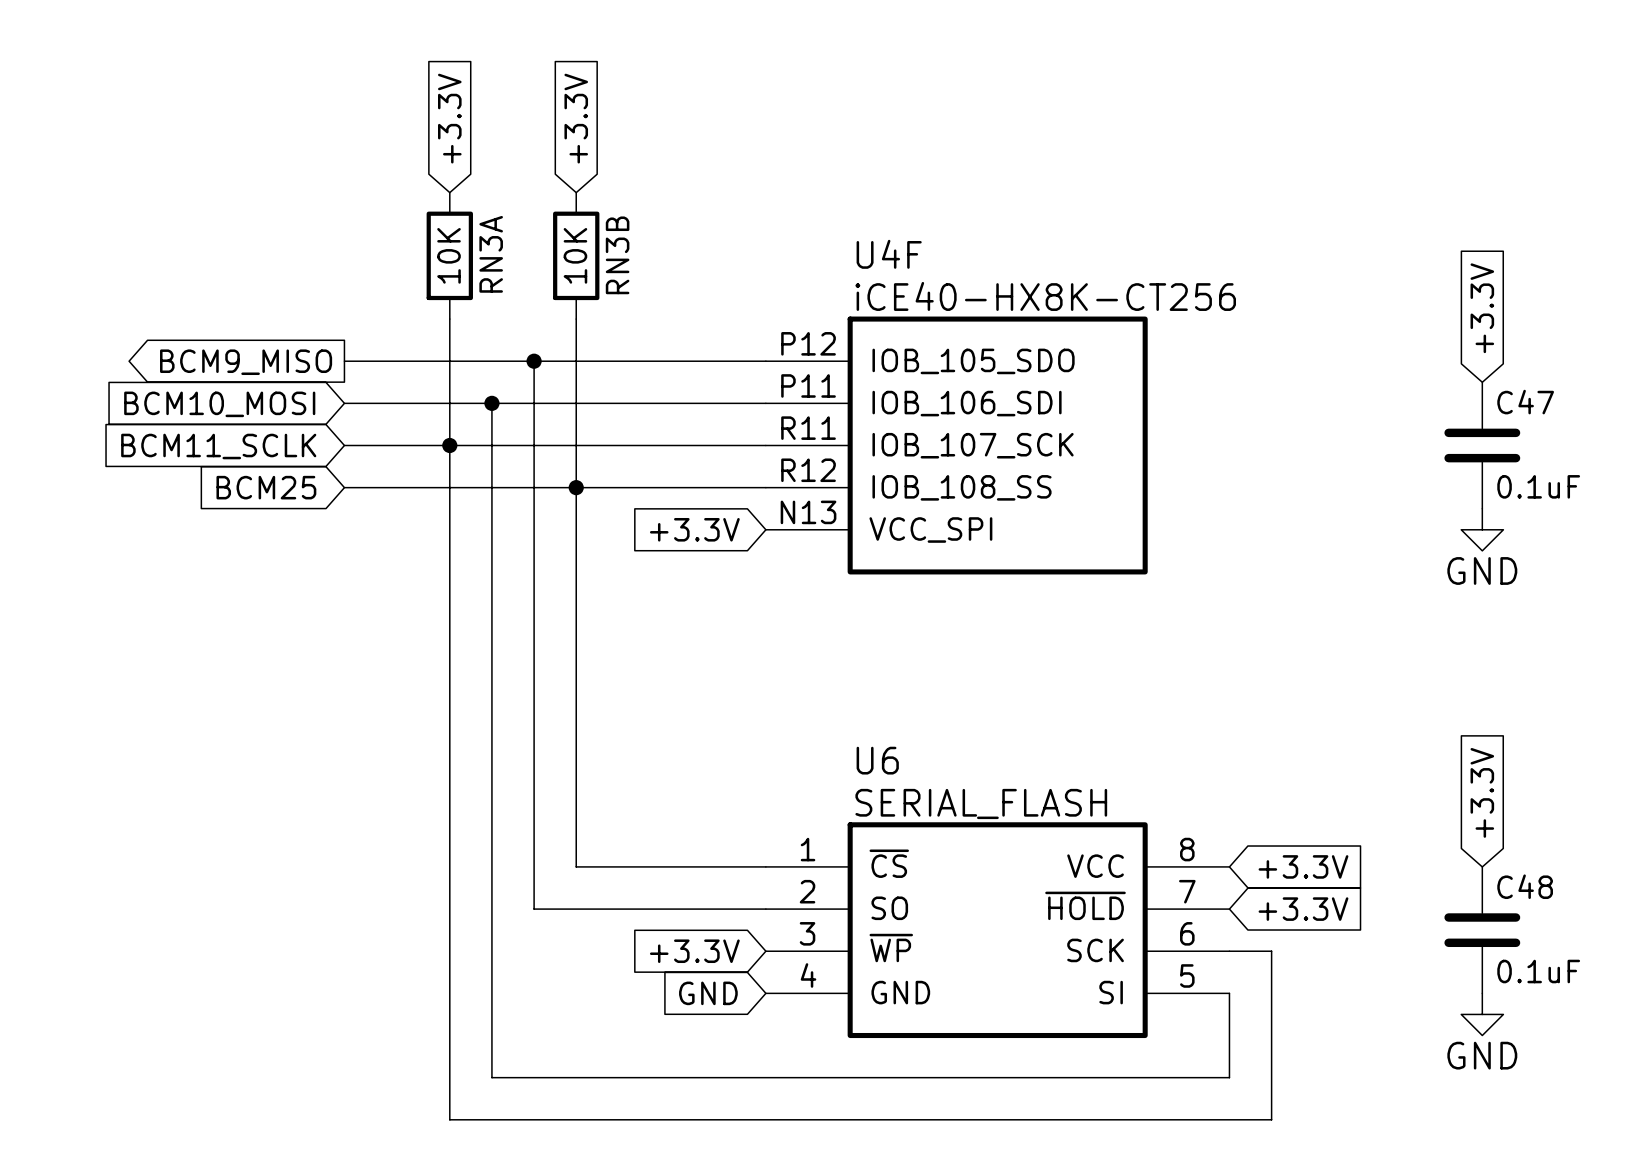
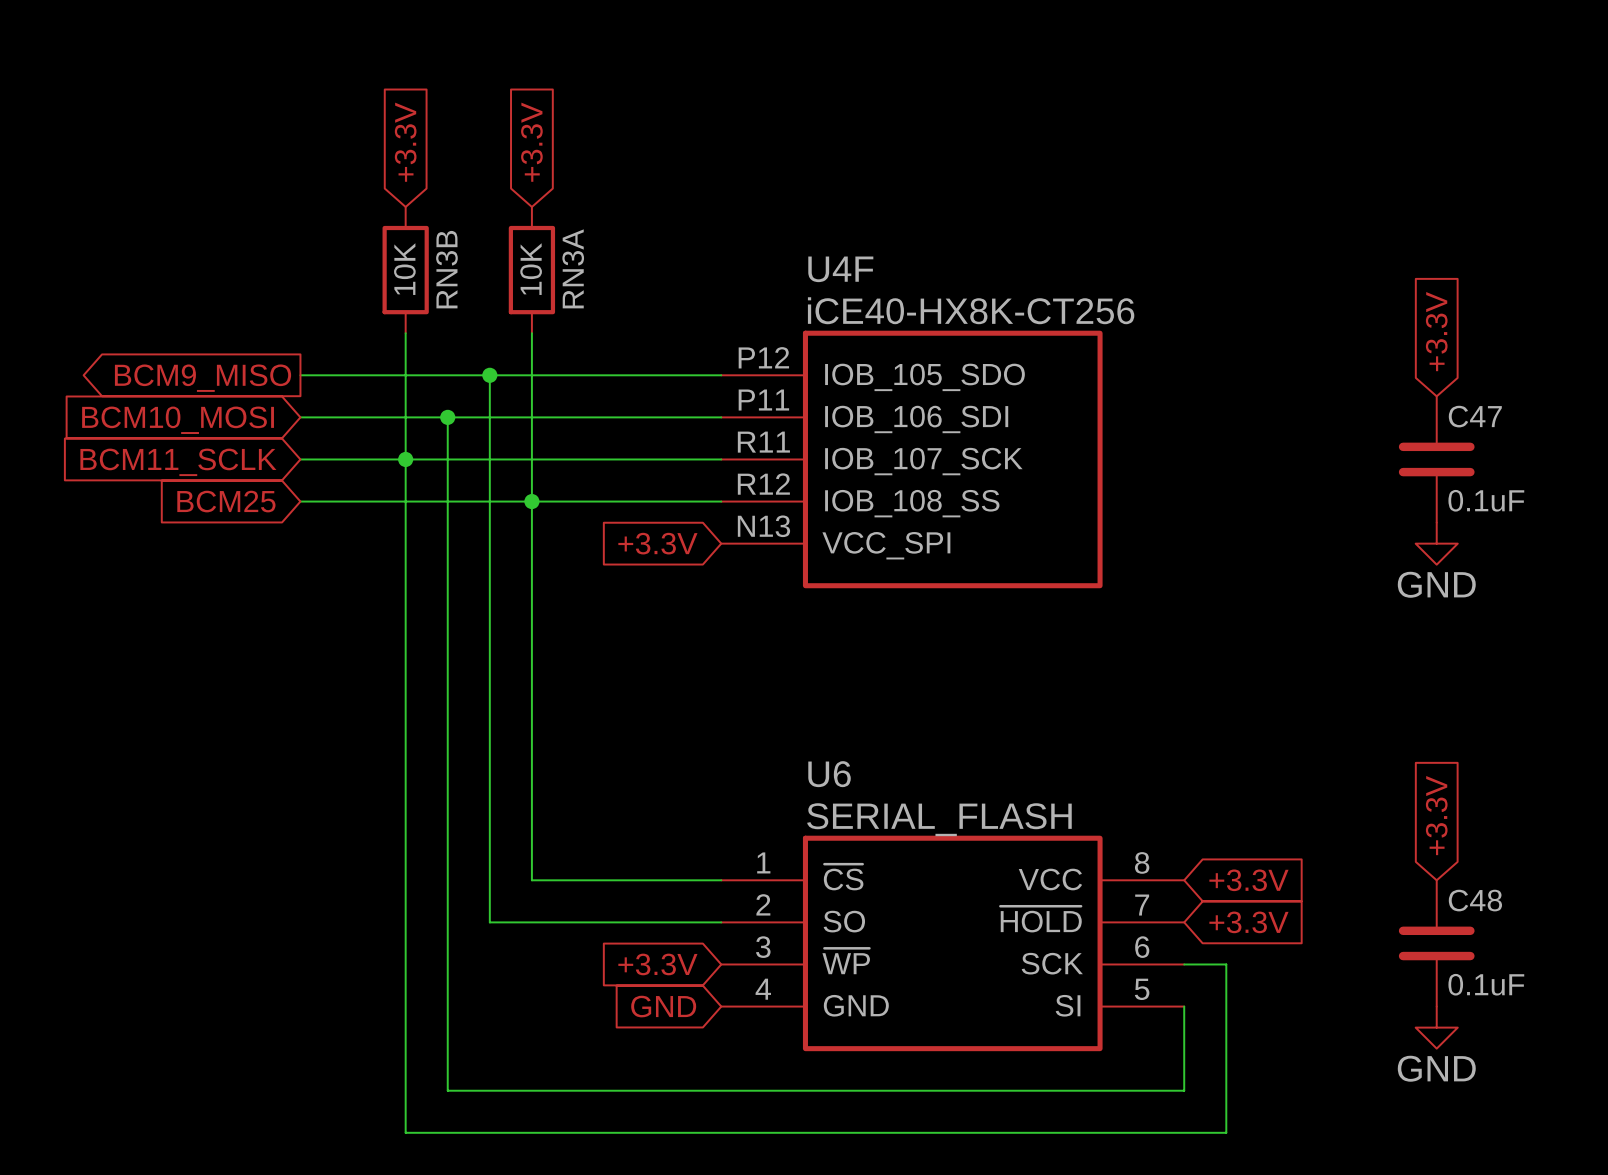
RN3A name: RN3A (491, 254) -> RN3B (446, 269)
RN3B name: RN3B (617, 255) -> RN3A (573, 268)

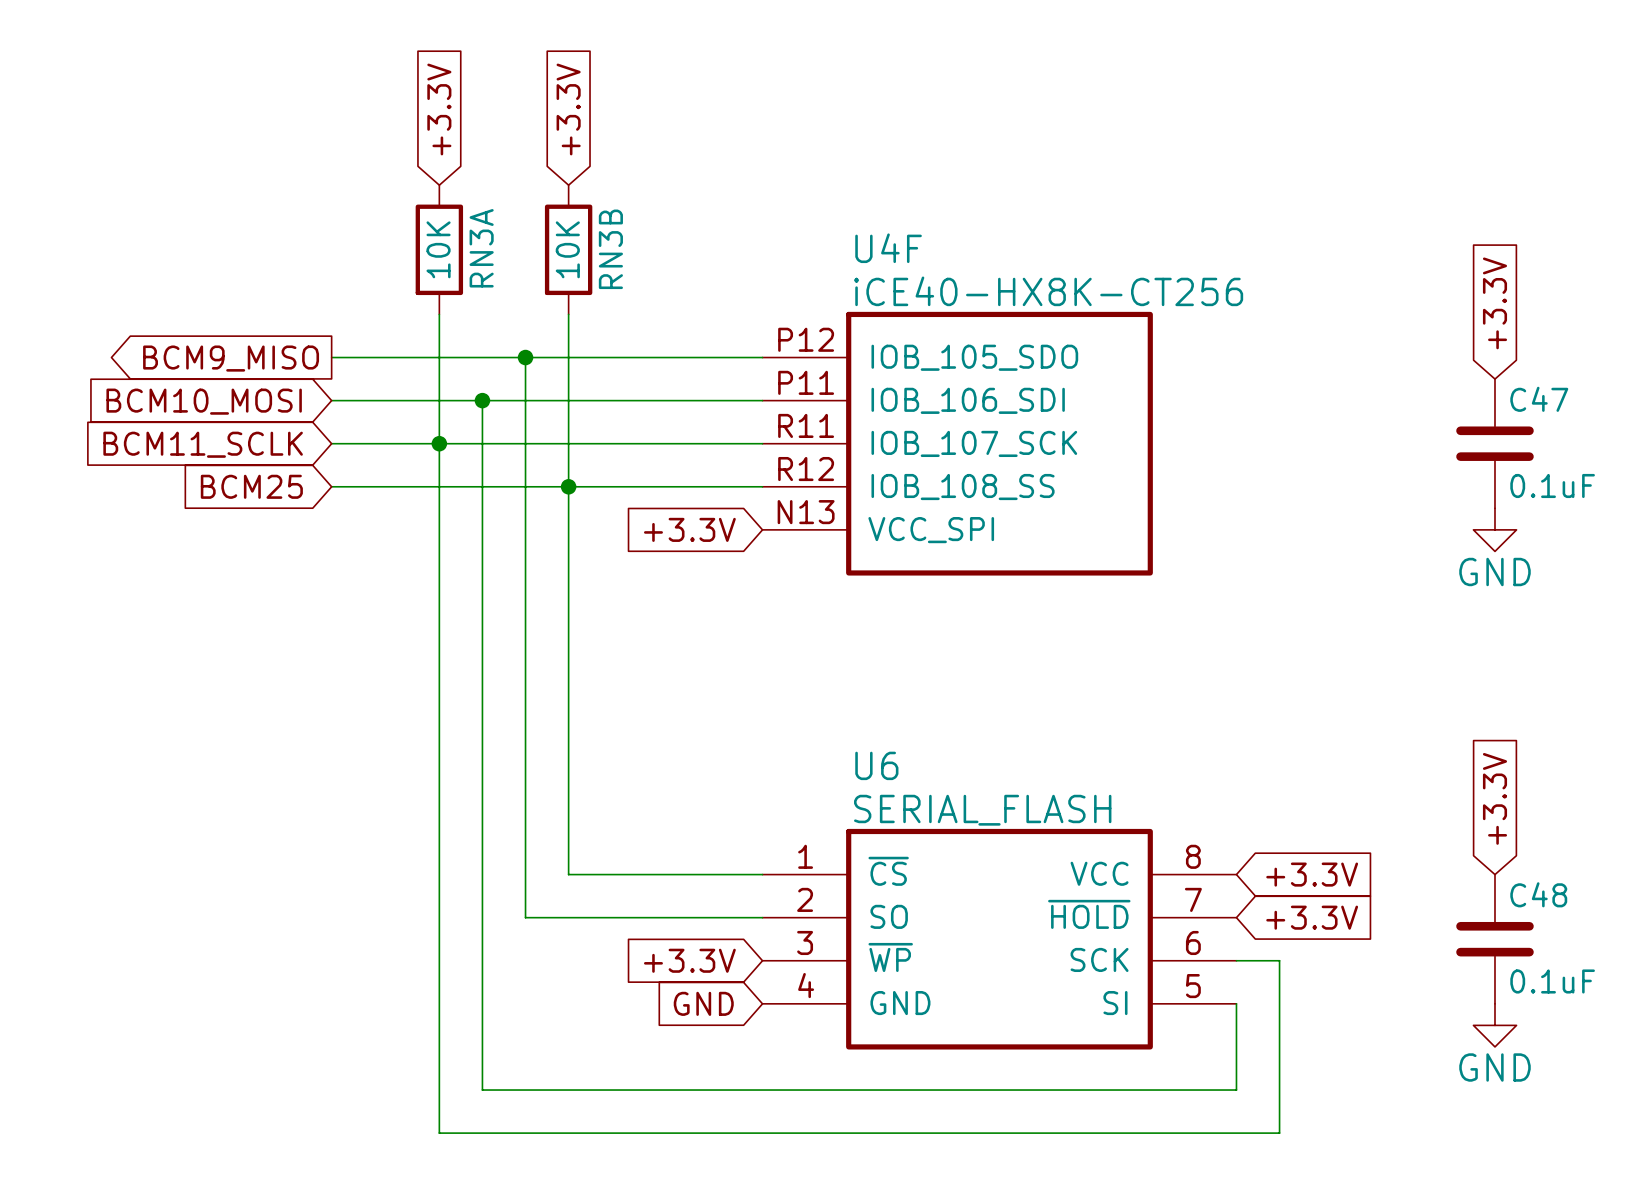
RN3A name: RN3A (573, 268) -> RN3B (610, 249)
RN3B name: RN3B (446, 269) -> RN3A (481, 248)

